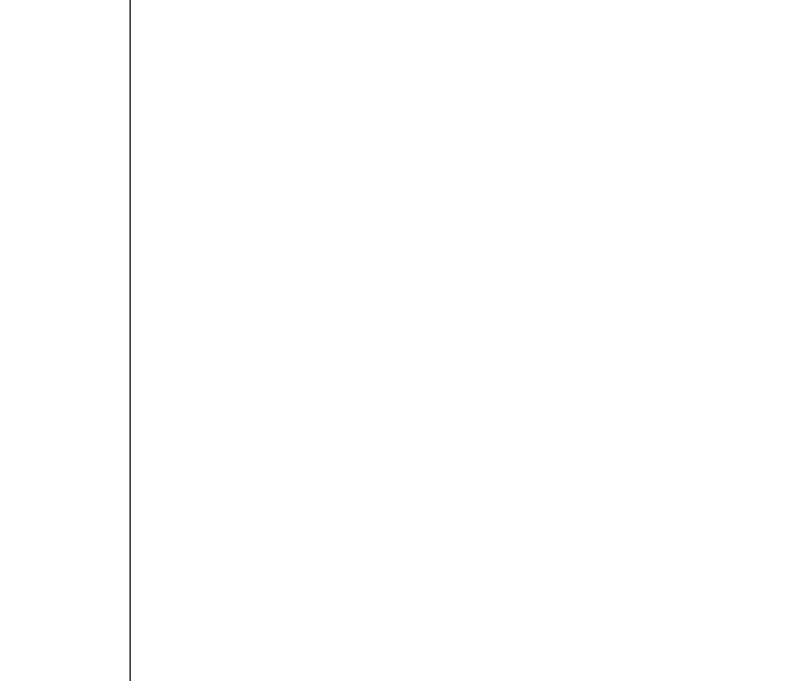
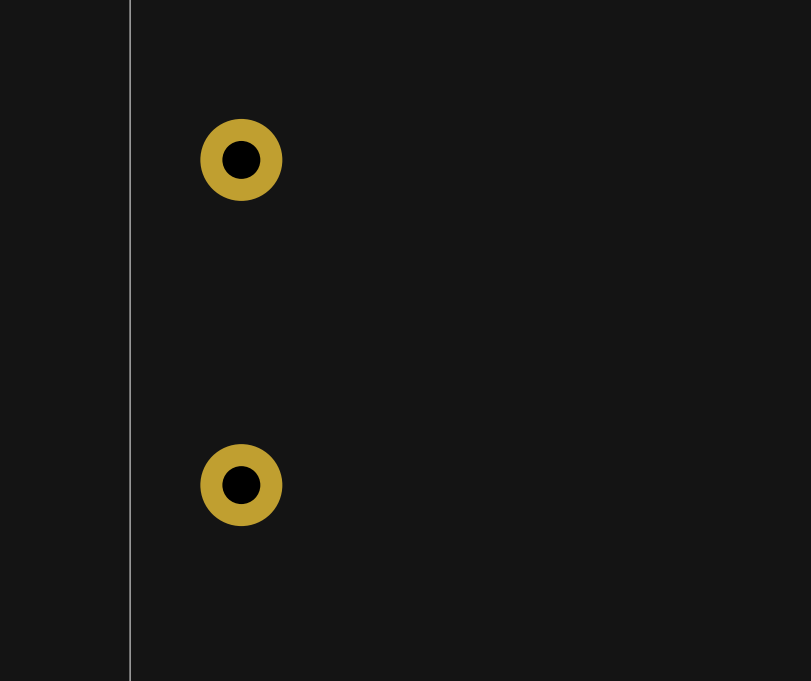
via: none -> (241, 159)
via: none -> (241, 485)

